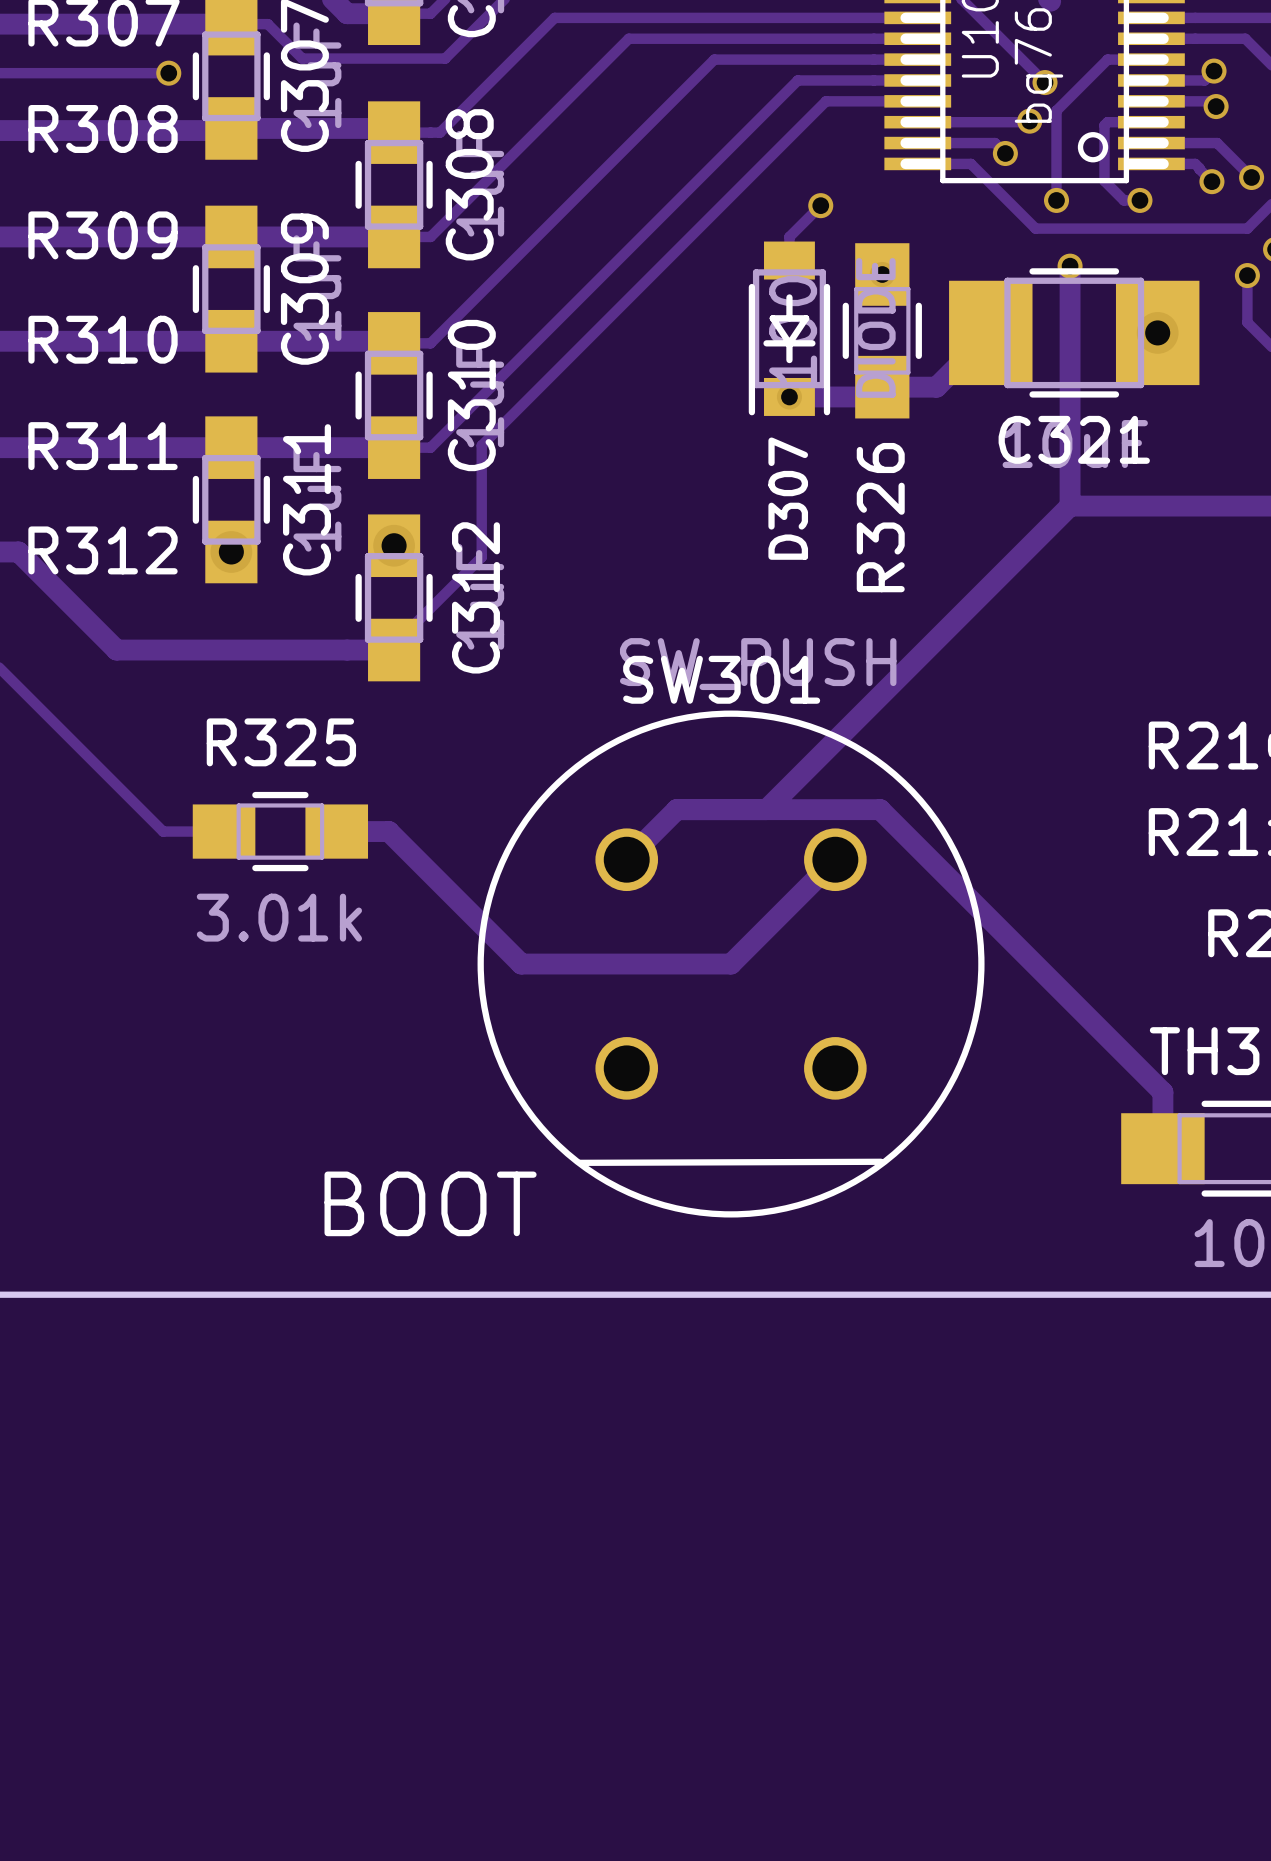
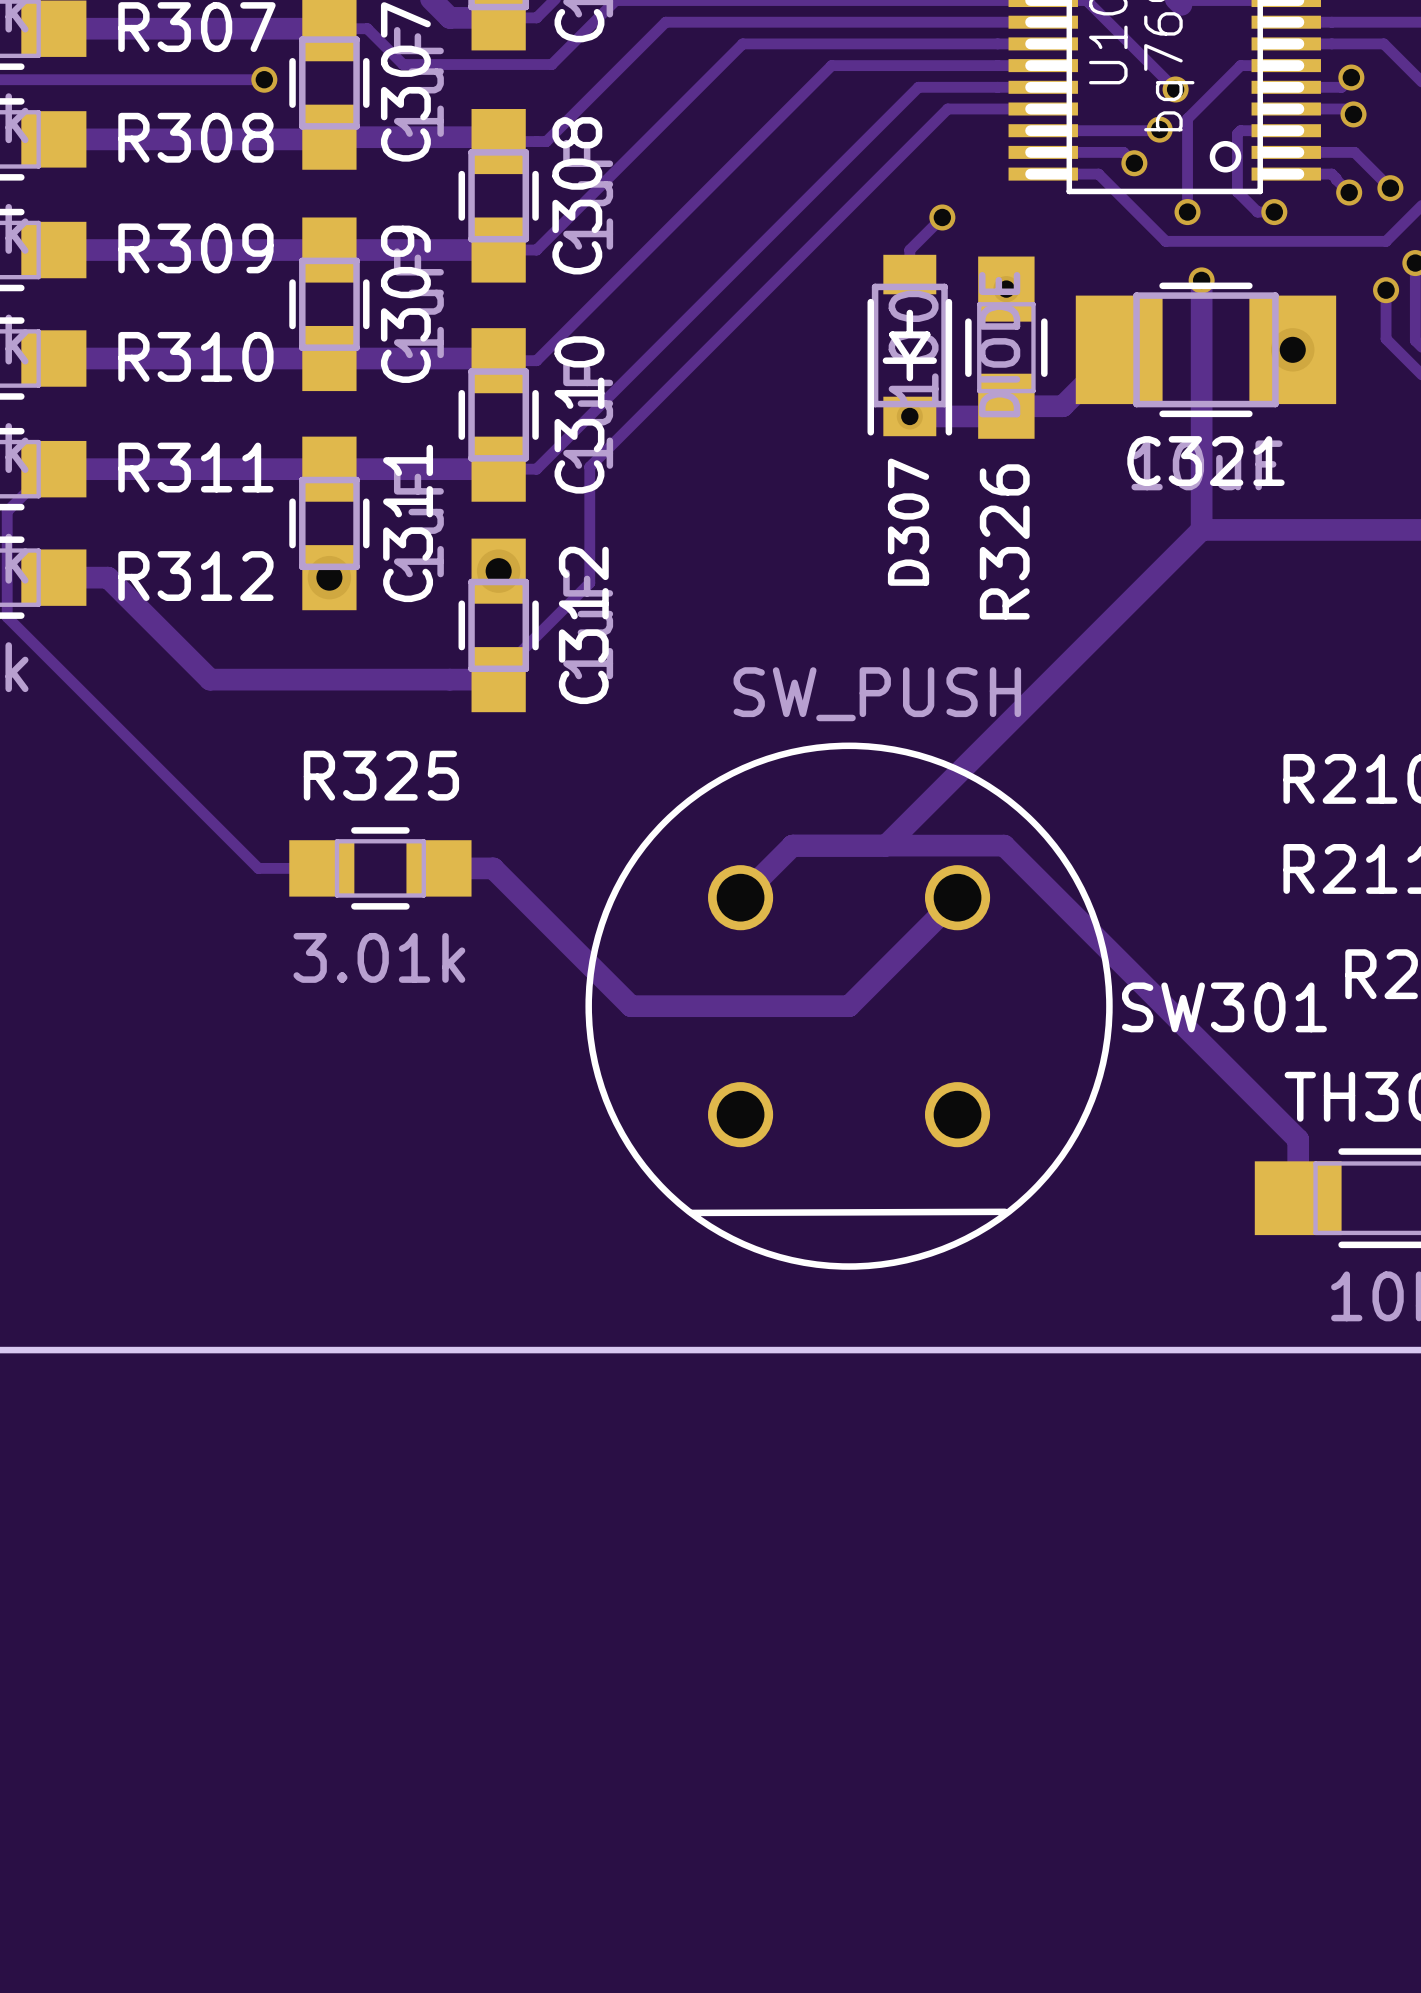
SW301 name position: SW301 (721, 679) -> SW301 (1224, 1007)
text: BOOT (430, 1203) -> none

